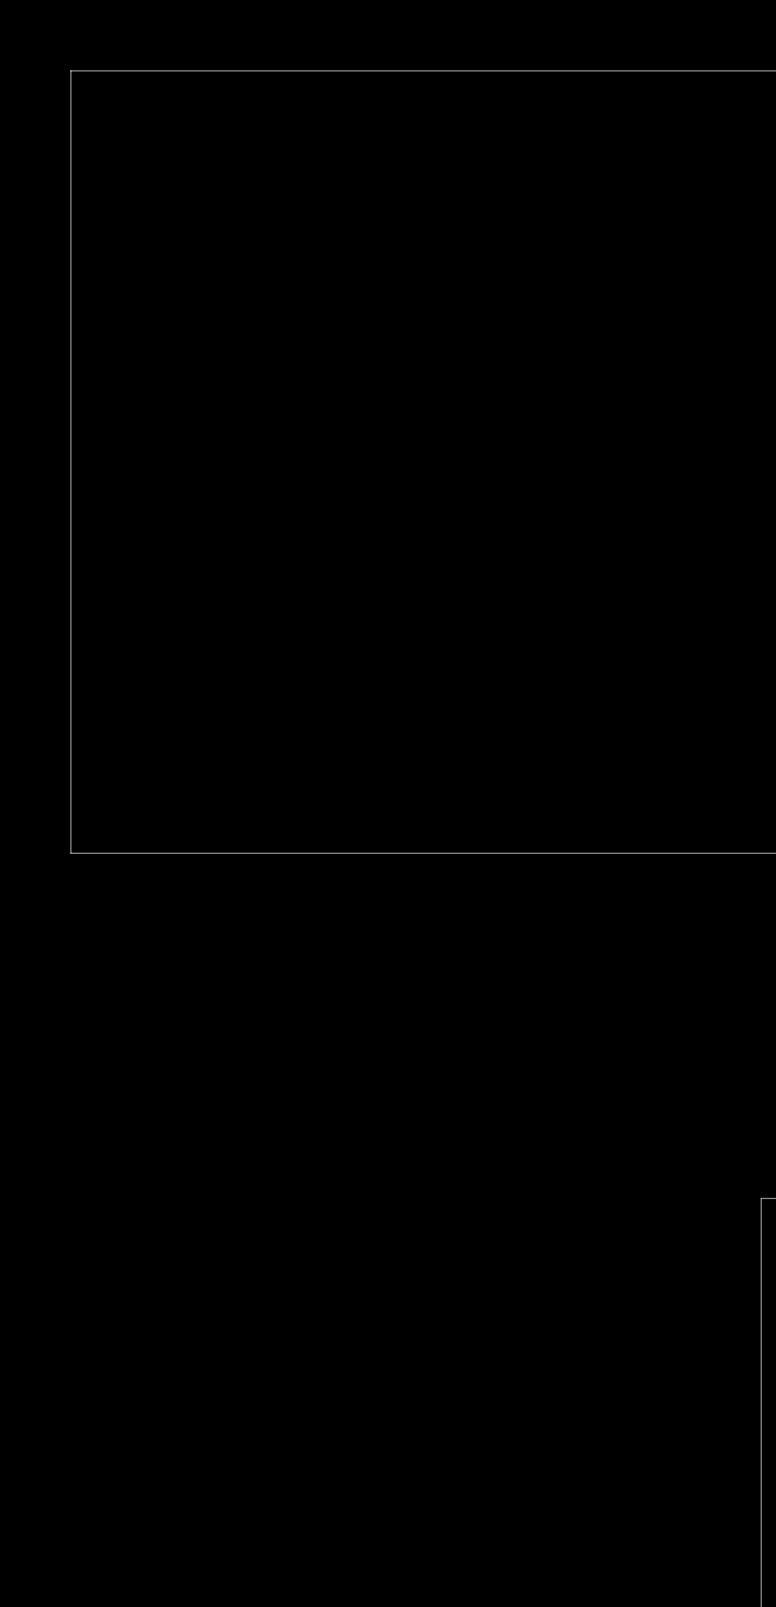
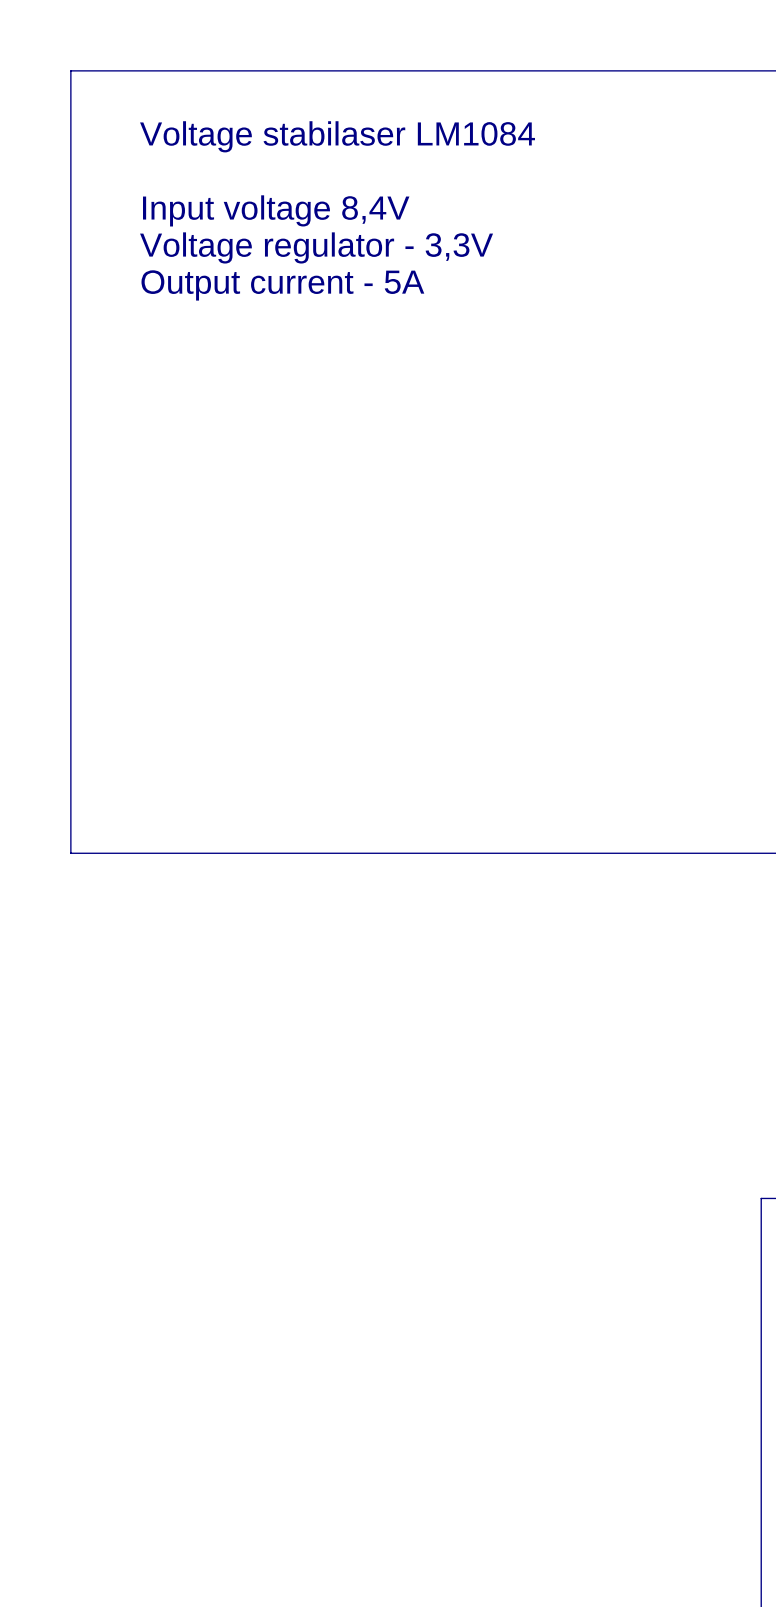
text: none -> Voltage stabilaser LM1084 (337, 136)
text: none -> Input voltage 8,4V (276, 210)
text: none -> Voltage regulator - 3,3V (316, 247)
text: none -> Output current - 5A (282, 285)

